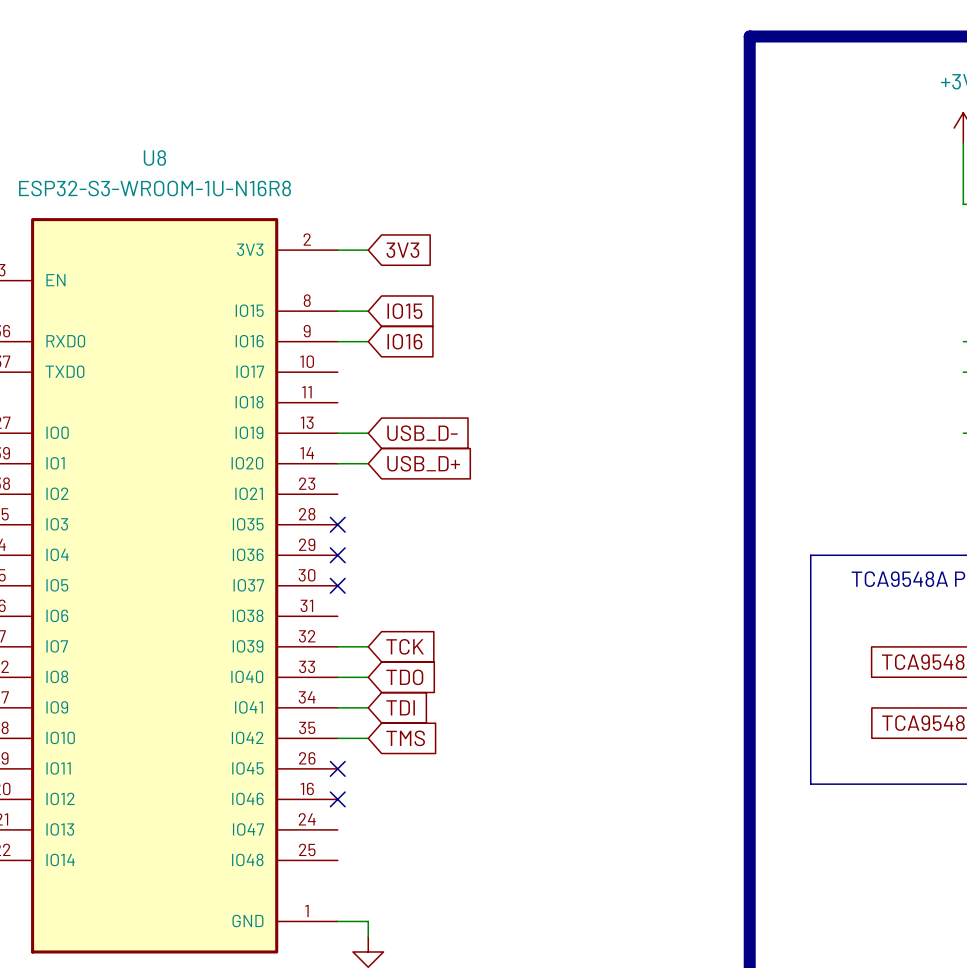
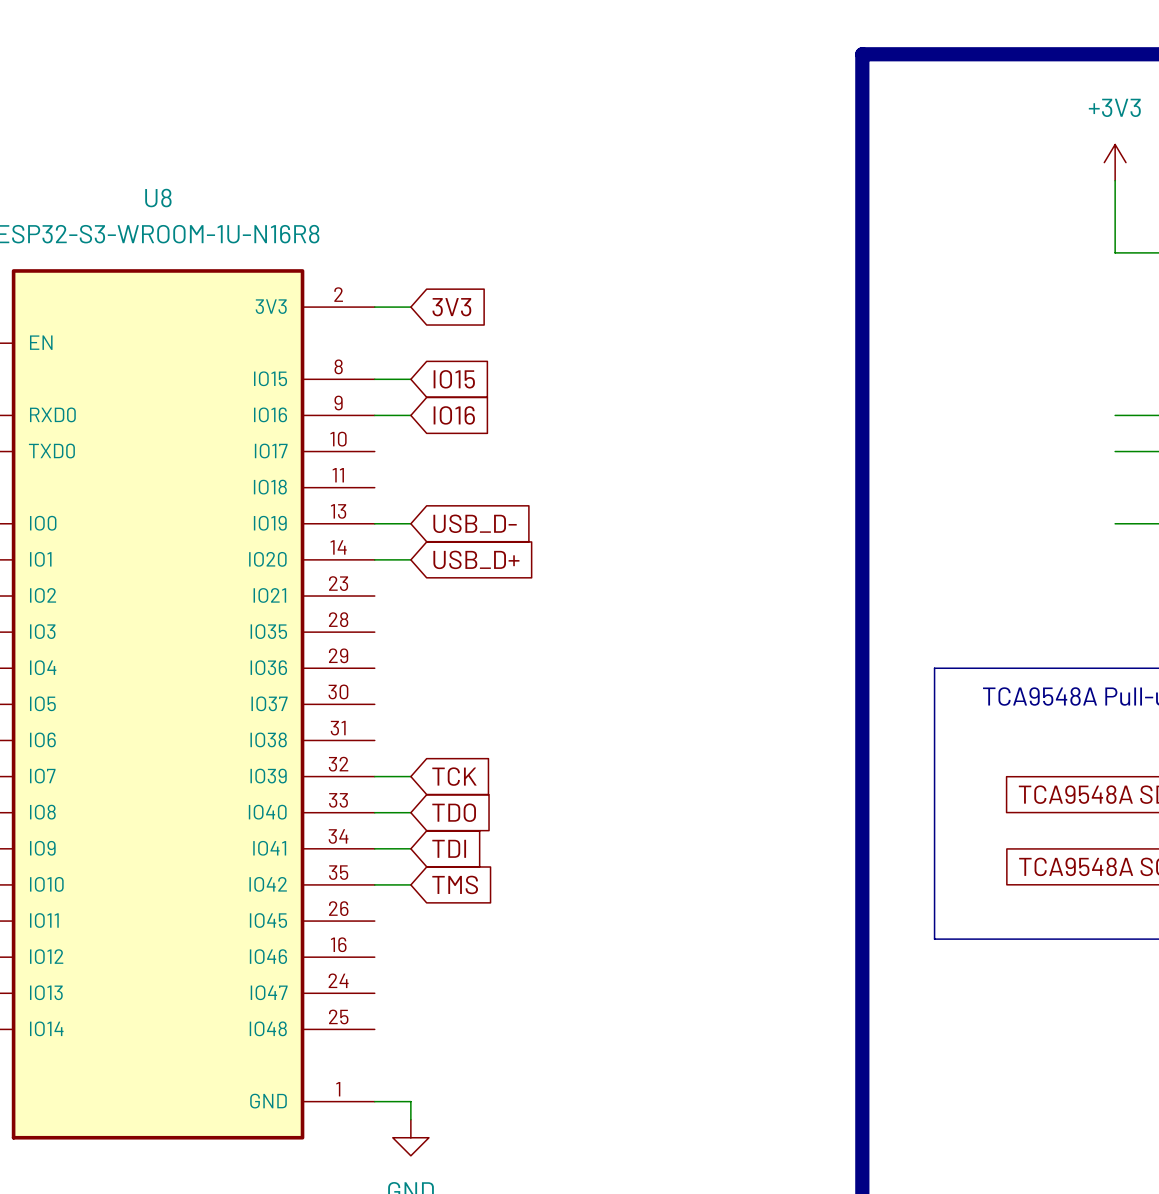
no-connect mark: (337, 524) -> none
no-connect mark: (337, 555) -> none
no-connect mark: (337, 585) -> none
no-connect mark: (337, 768) -> none
no-connect mark: (337, 799) -> none

